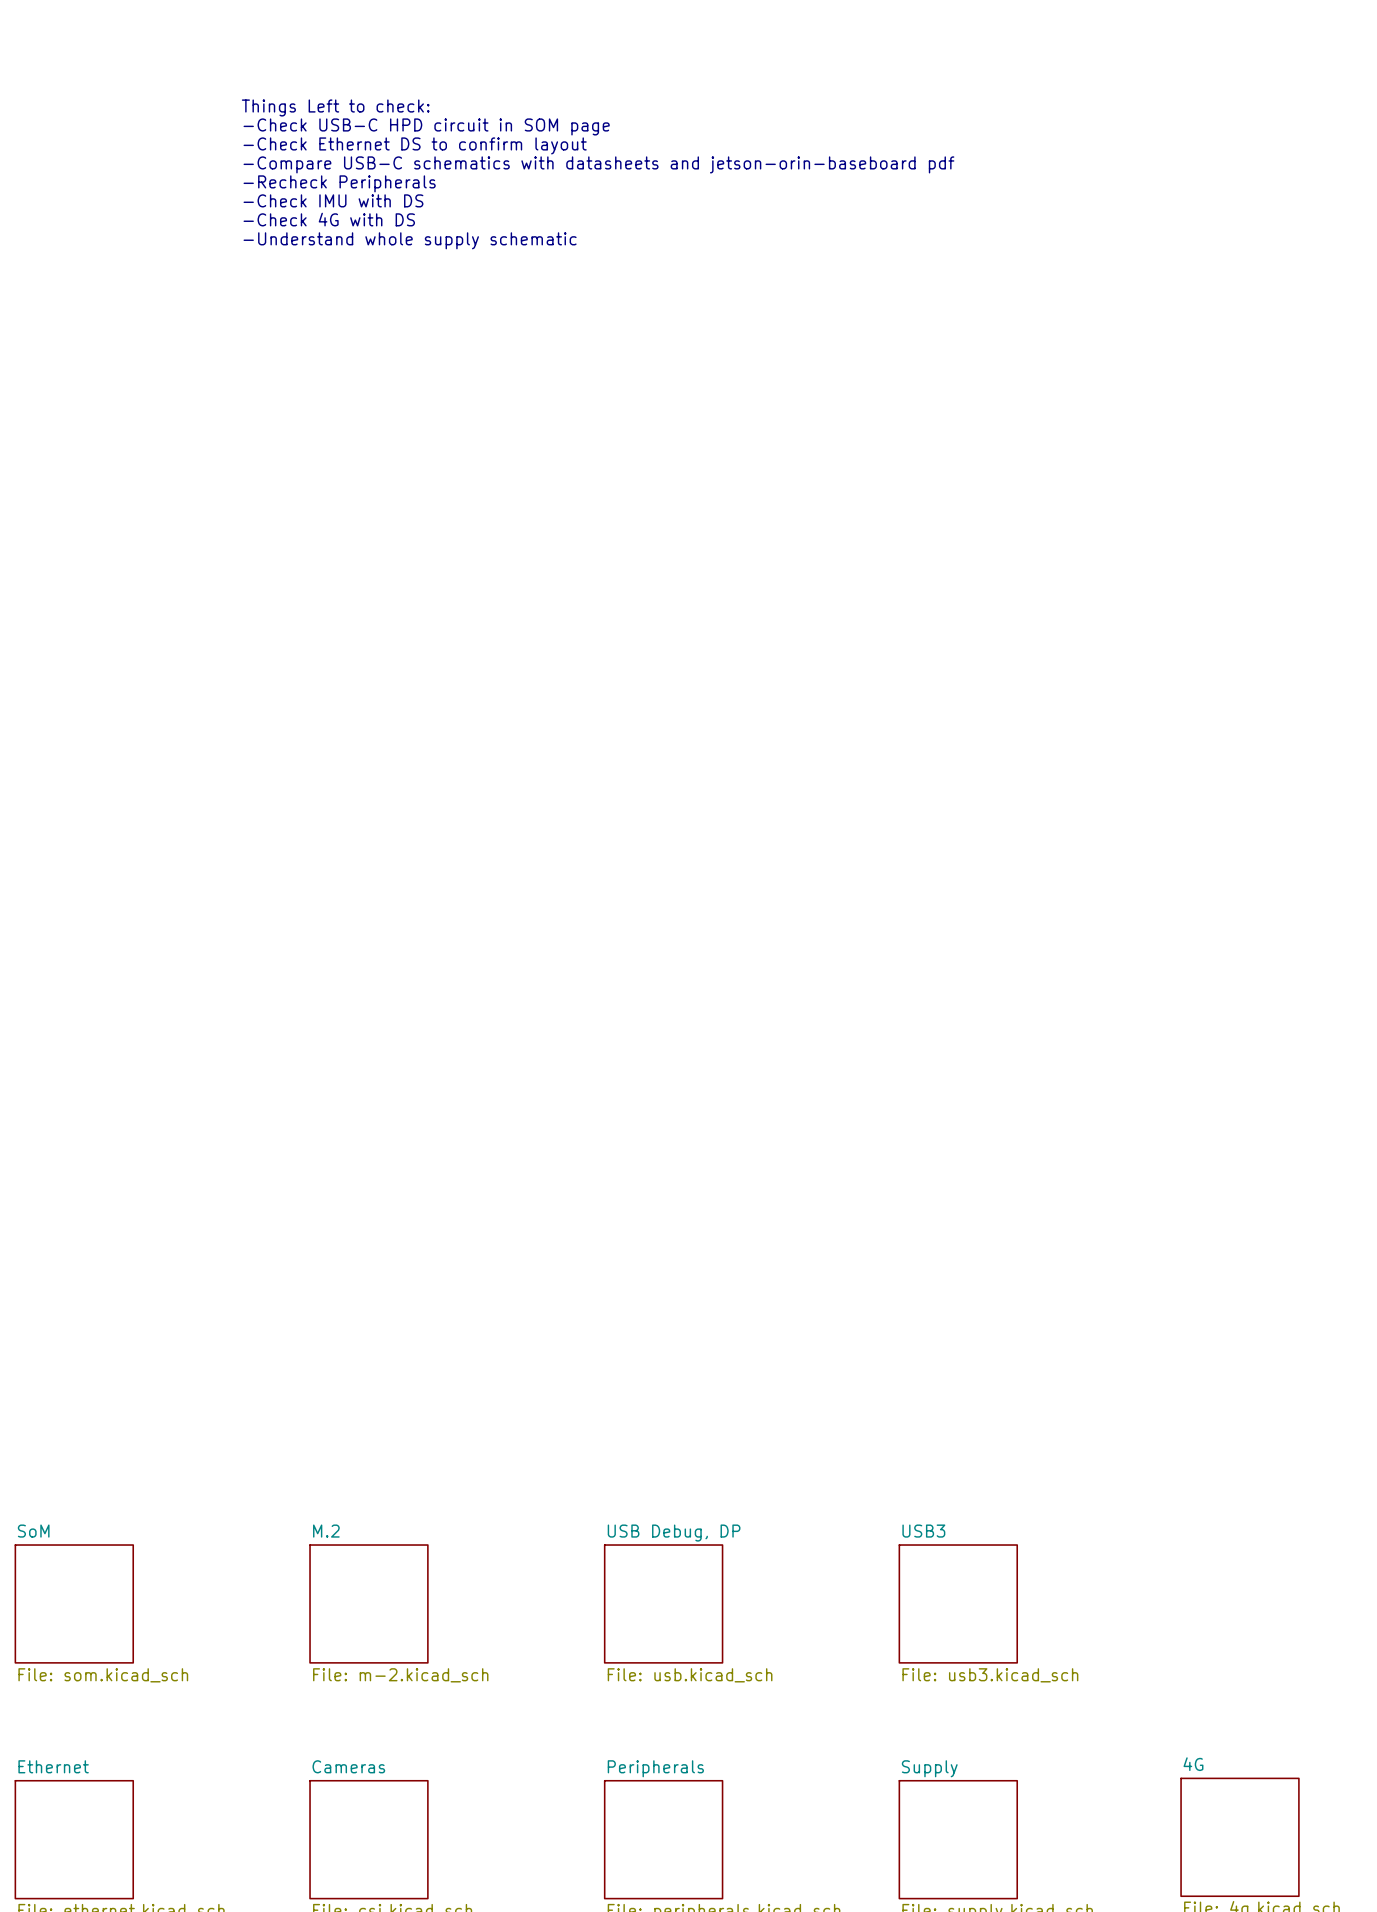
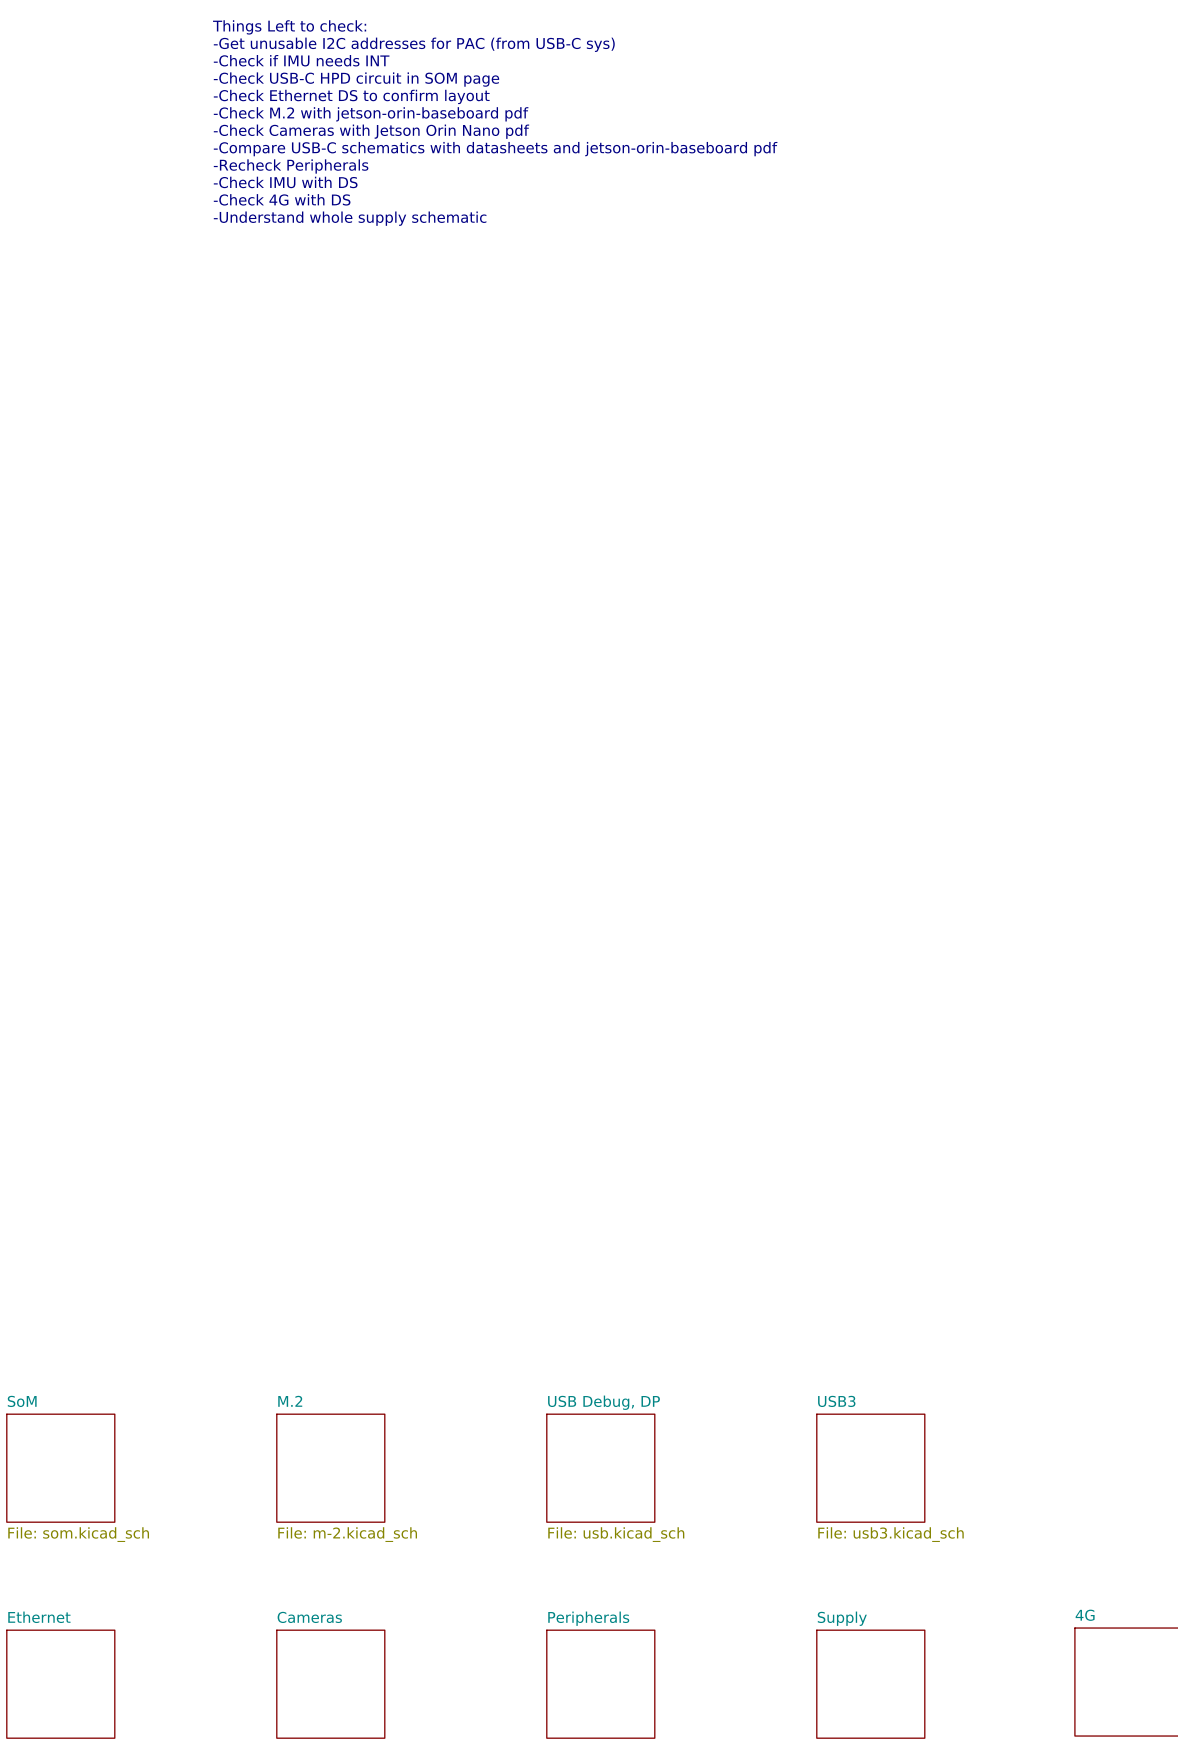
text: none -> Things Left to check: (289, 27)
text: none -> -Get unusable I2C addresses for PAC (from USB-C sys) (414, 44)
text: none -> -Check if IMU needs INT (301, 60)
text: none -> -Check USB-C HPD circuit in SOM page (356, 79)
text: Things Left to check: (335, 107) -> -Check Ethernet DS to confirm layout (351, 96)
text: -Check USB-C HPD circuit in SOM page (426, 126) -> -Check M.2 with jetson-orin-baseboard pdf (371, 114)
text: -Check Ethernet DS to confirm layout (415, 145) -> -Check Cameras with Jetson Orin Nano pdf (371, 131)

